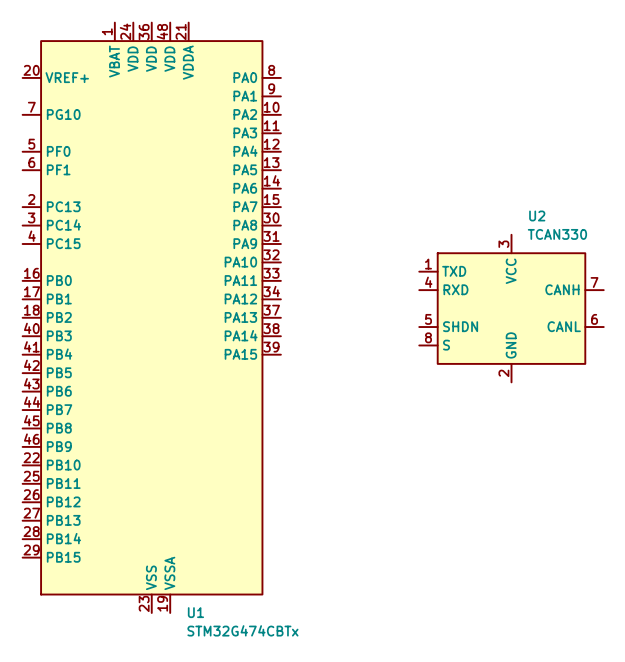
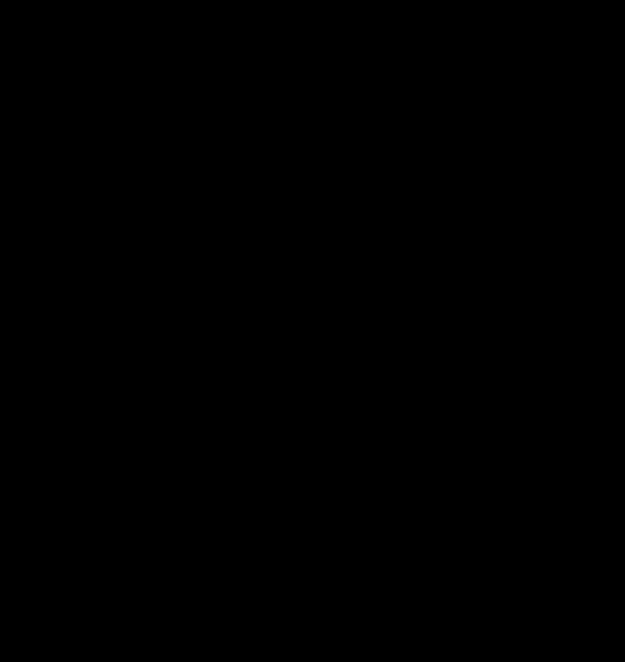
U2: TCAN330 (511, 308) -> none
U1: STM32G474CBTx (151, 317) -> none

